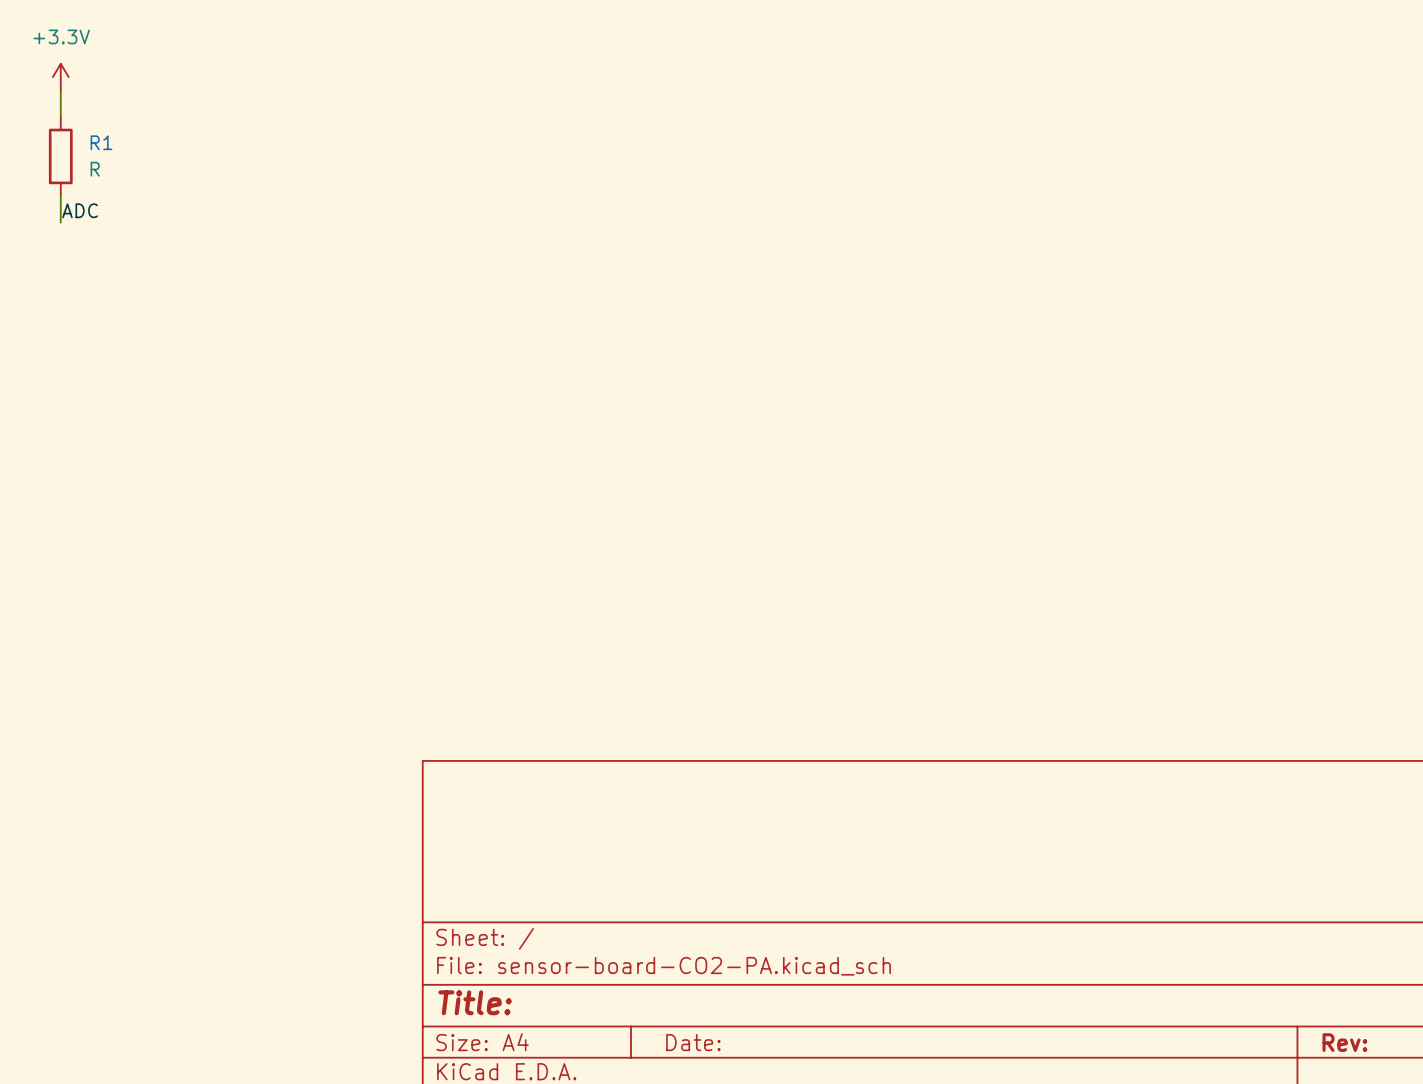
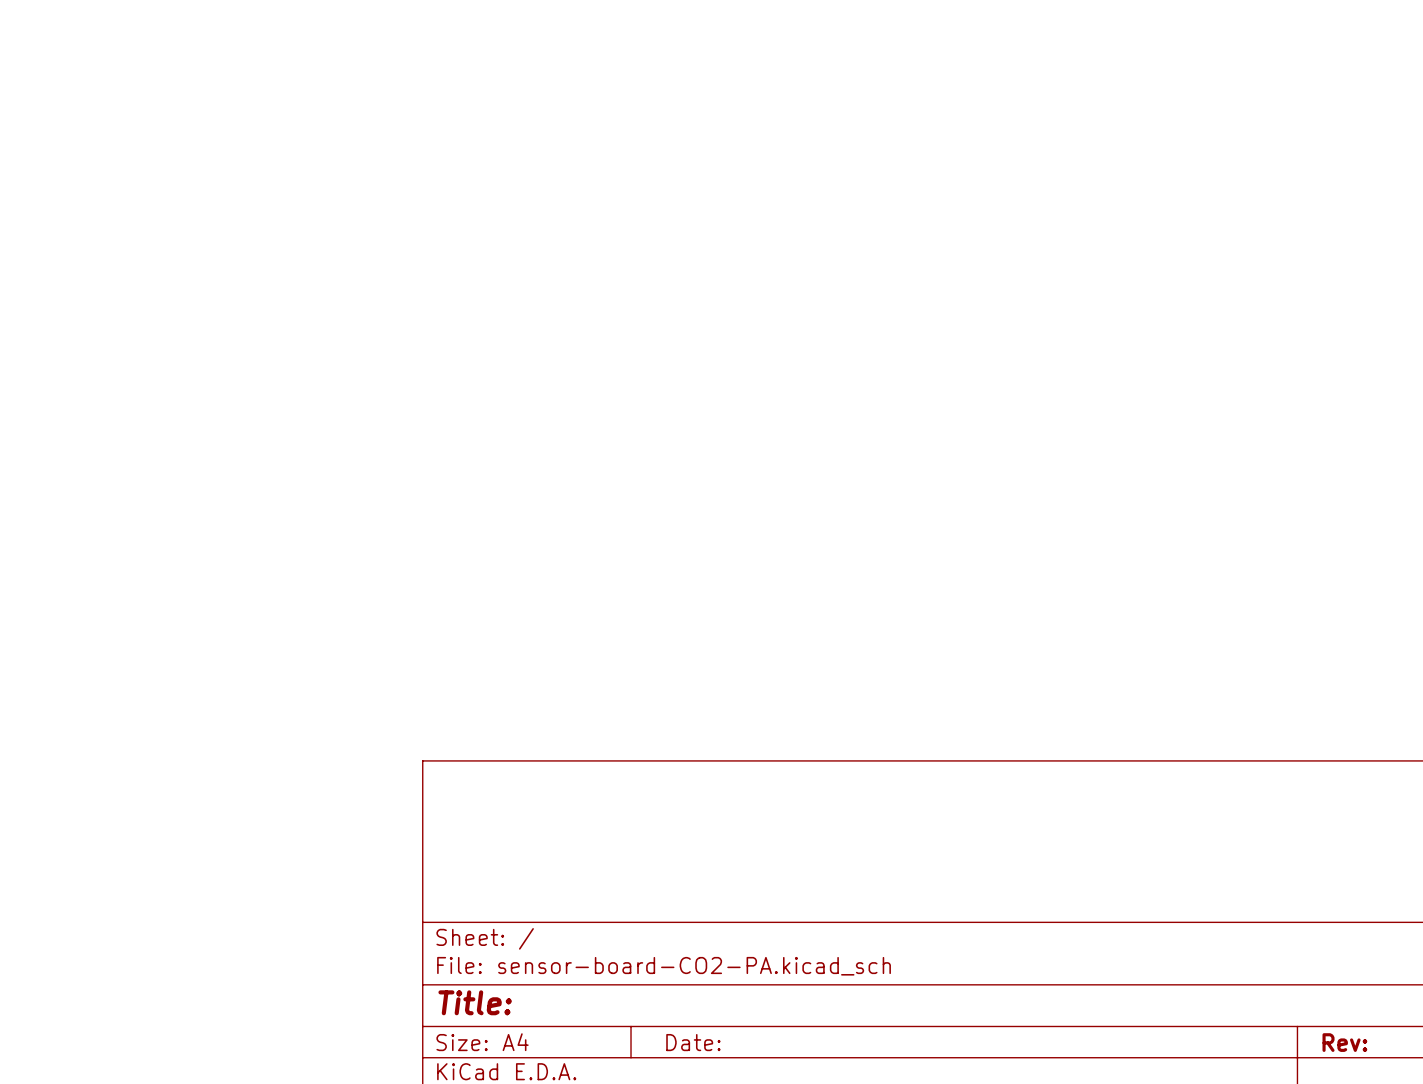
power symbol: +3.3V (60, 77) -> none
wire: (60, 90) (60, 116) -> none
R1: R (60, 156) -> none
wire: (60, 196) (60, 222) -> none
label: ADC (80, 210) -> none

